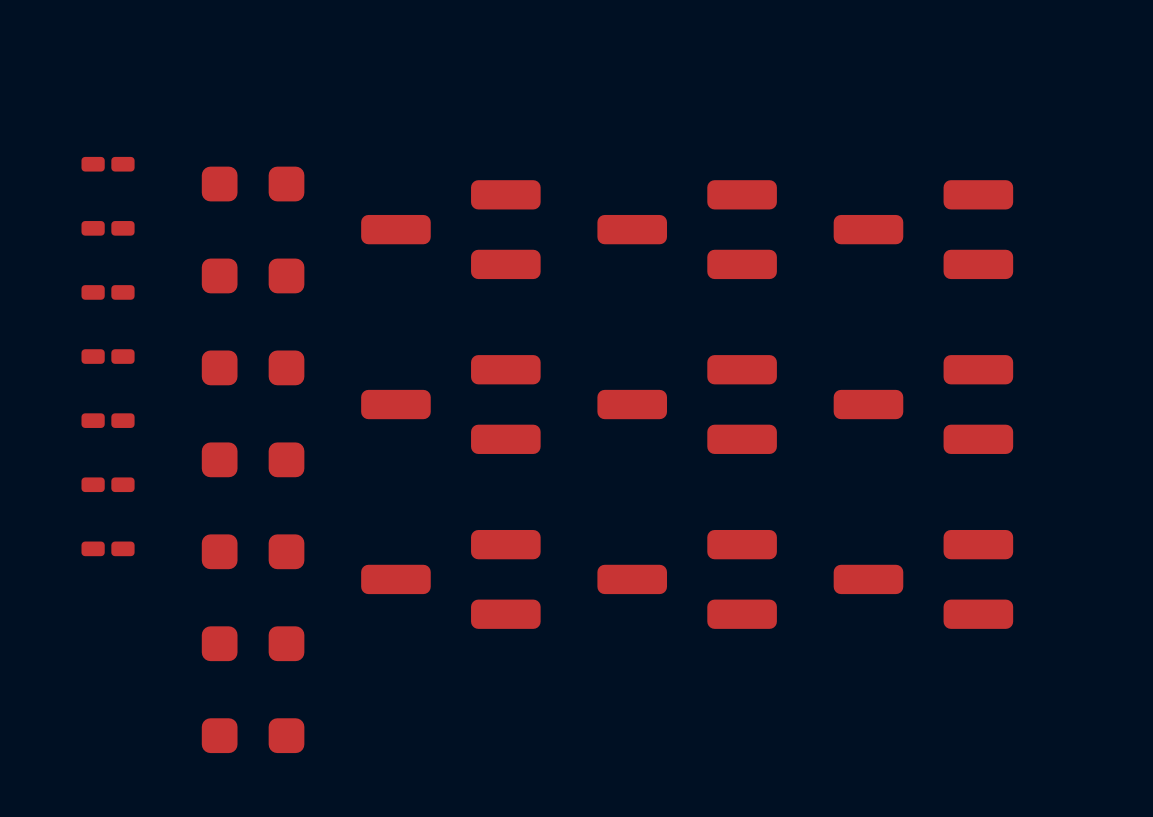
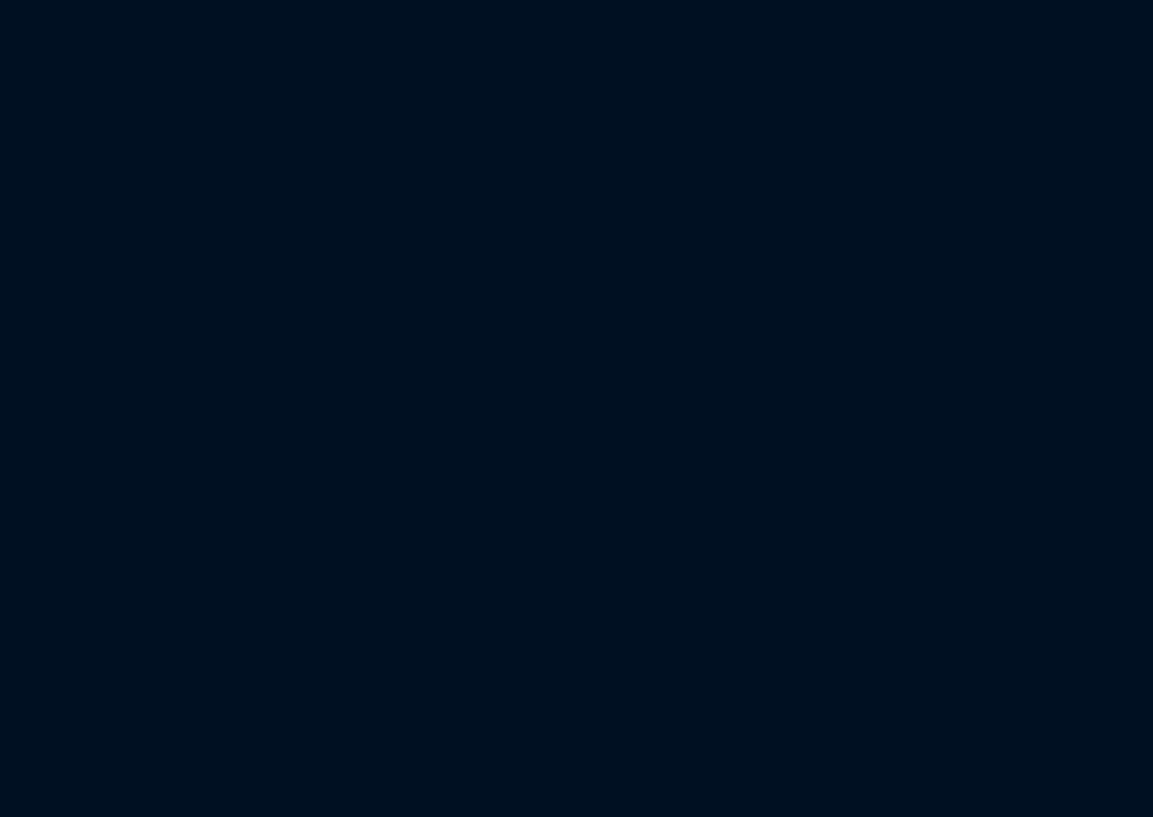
part: (108, 164) -> none
part: (253, 184) -> none
part: (108, 228) -> none
part: (450, 229) -> none
part: (687, 229) -> none
part: (923, 229) -> none
part: (253, 275) -> none
part: (108, 292) -> none
part: (108, 356) -> none
part: (253, 367) -> none
part: (450, 404) -> none
part: (687, 404) -> none
part: (923, 404) -> none
part: (108, 420) -> none
part: (253, 459) -> none
part: (108, 484) -> none
part: (108, 548) -> none
part: (253, 551) -> none
part: (450, 579) -> none
part: (687, 579) -> none
part: (923, 579) -> none
part: (253, 643) -> none
part: (253, 735) -> none

